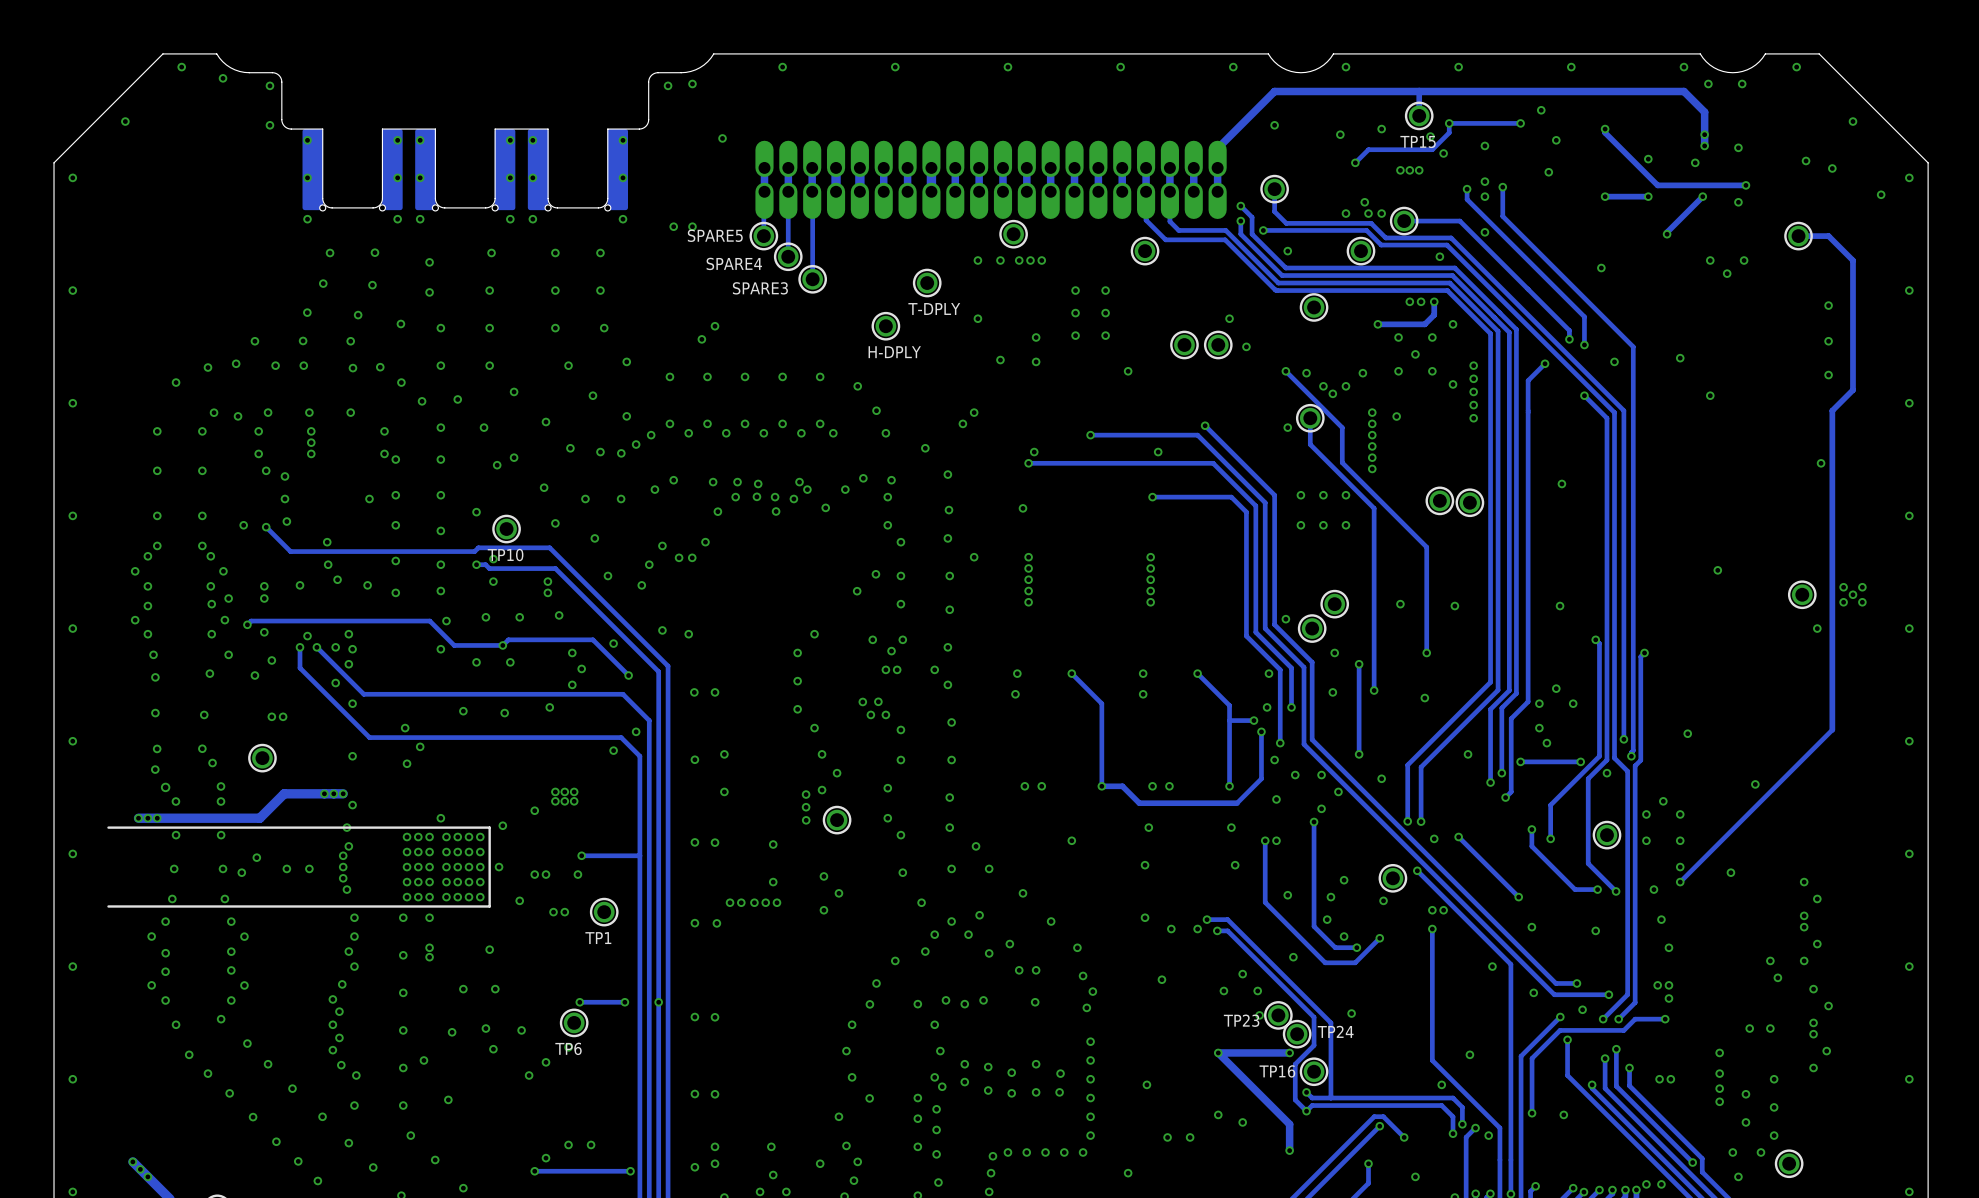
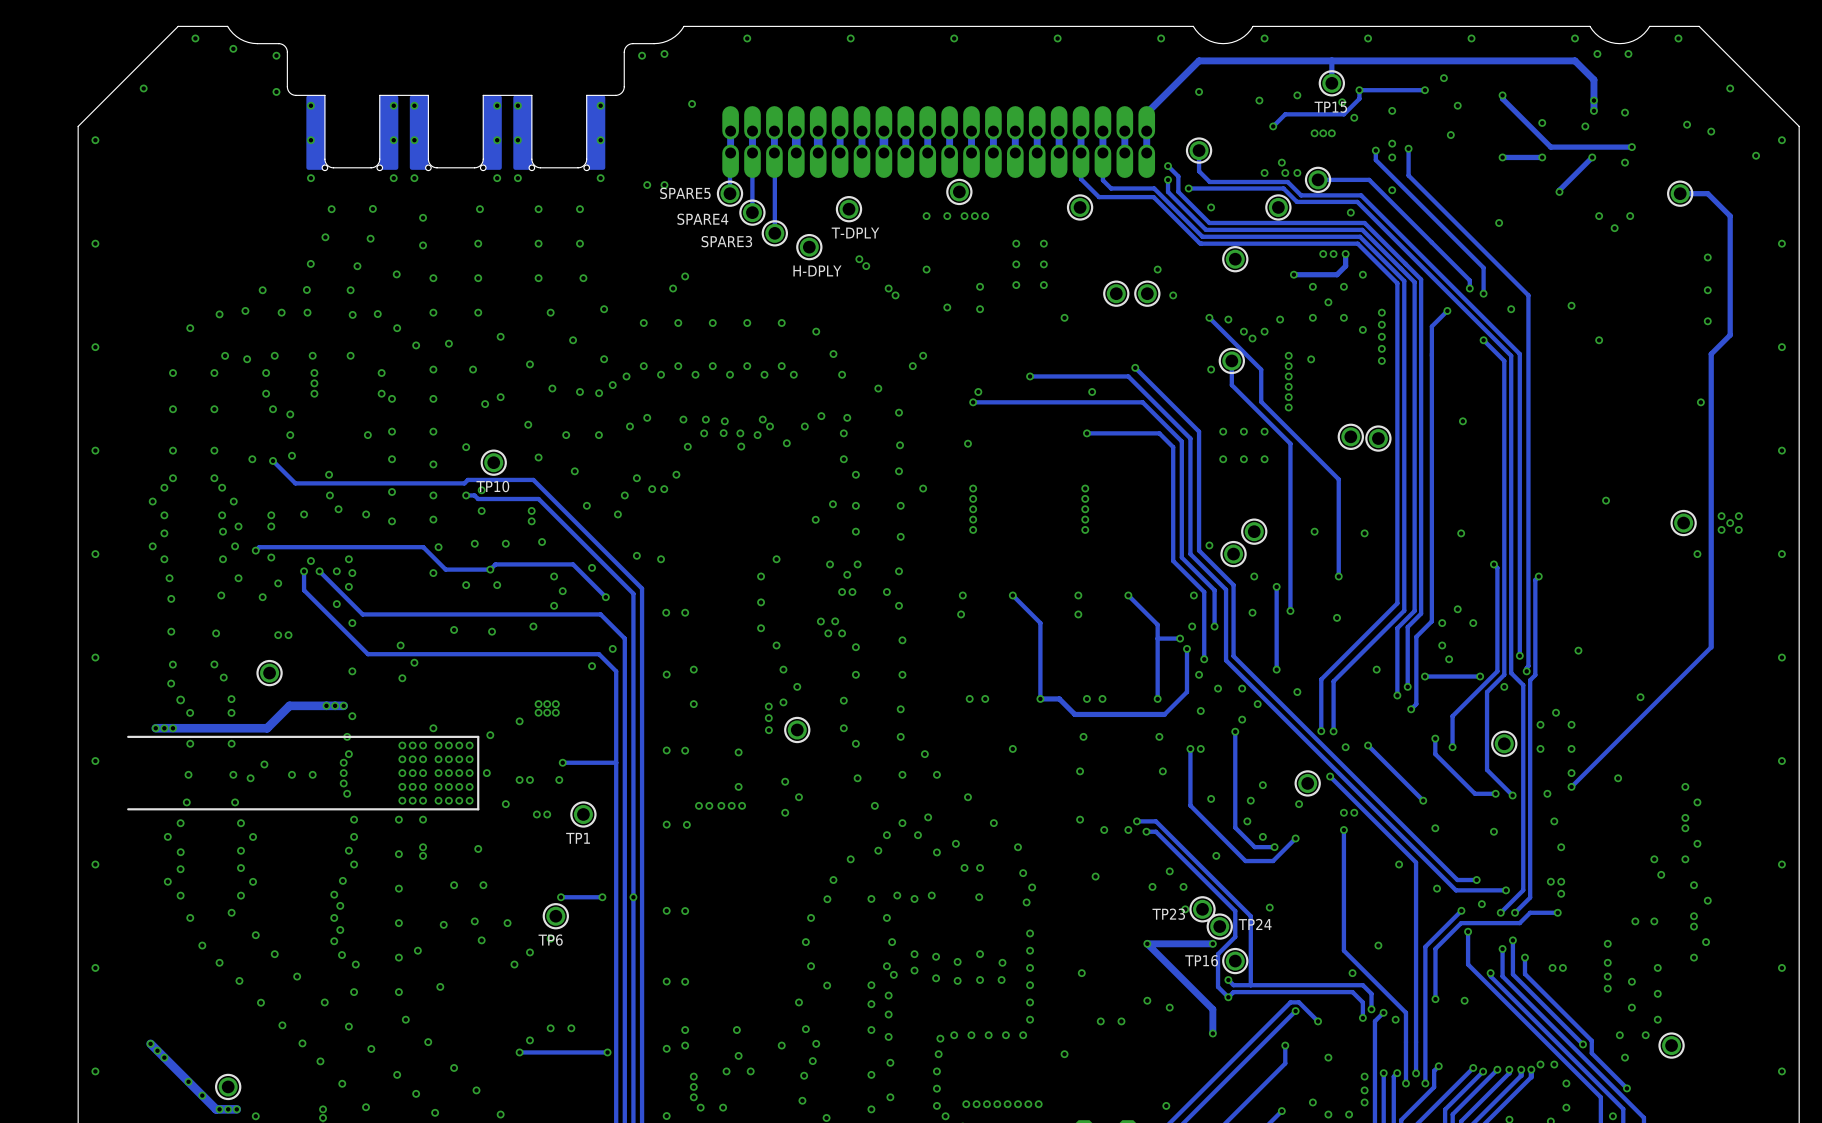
T-DPLY position: (927, 283) -> (848, 209)
via: none -> (859, 259)
via: none -> (866, 266)
H-DPLY position: (885, 326) -> (809, 247)
via: none -> (888, 288)
via: none -> (895, 295)

